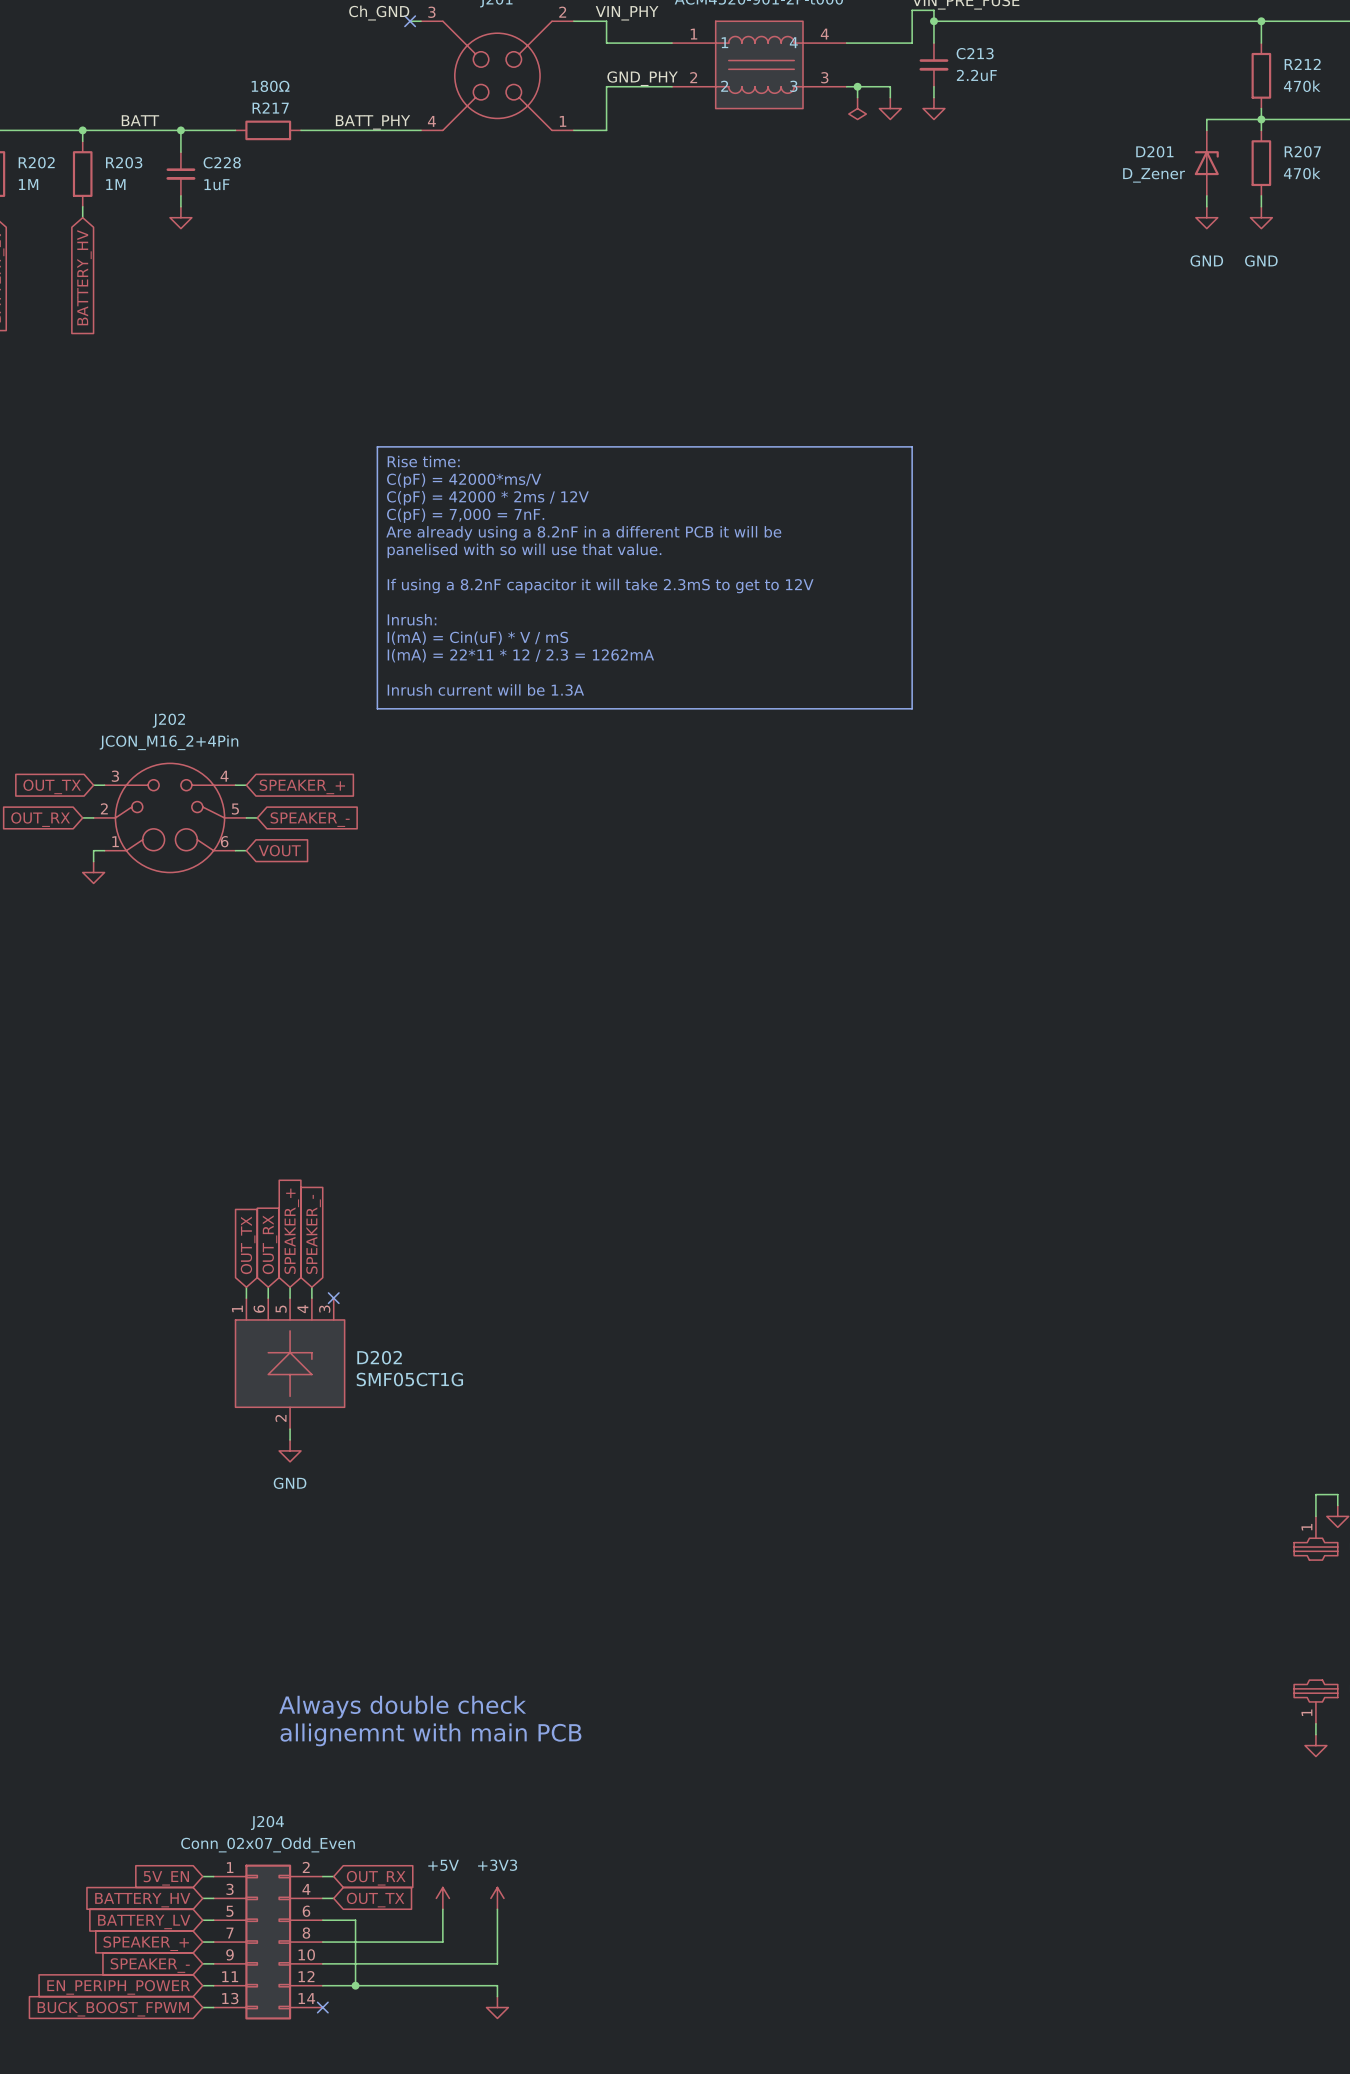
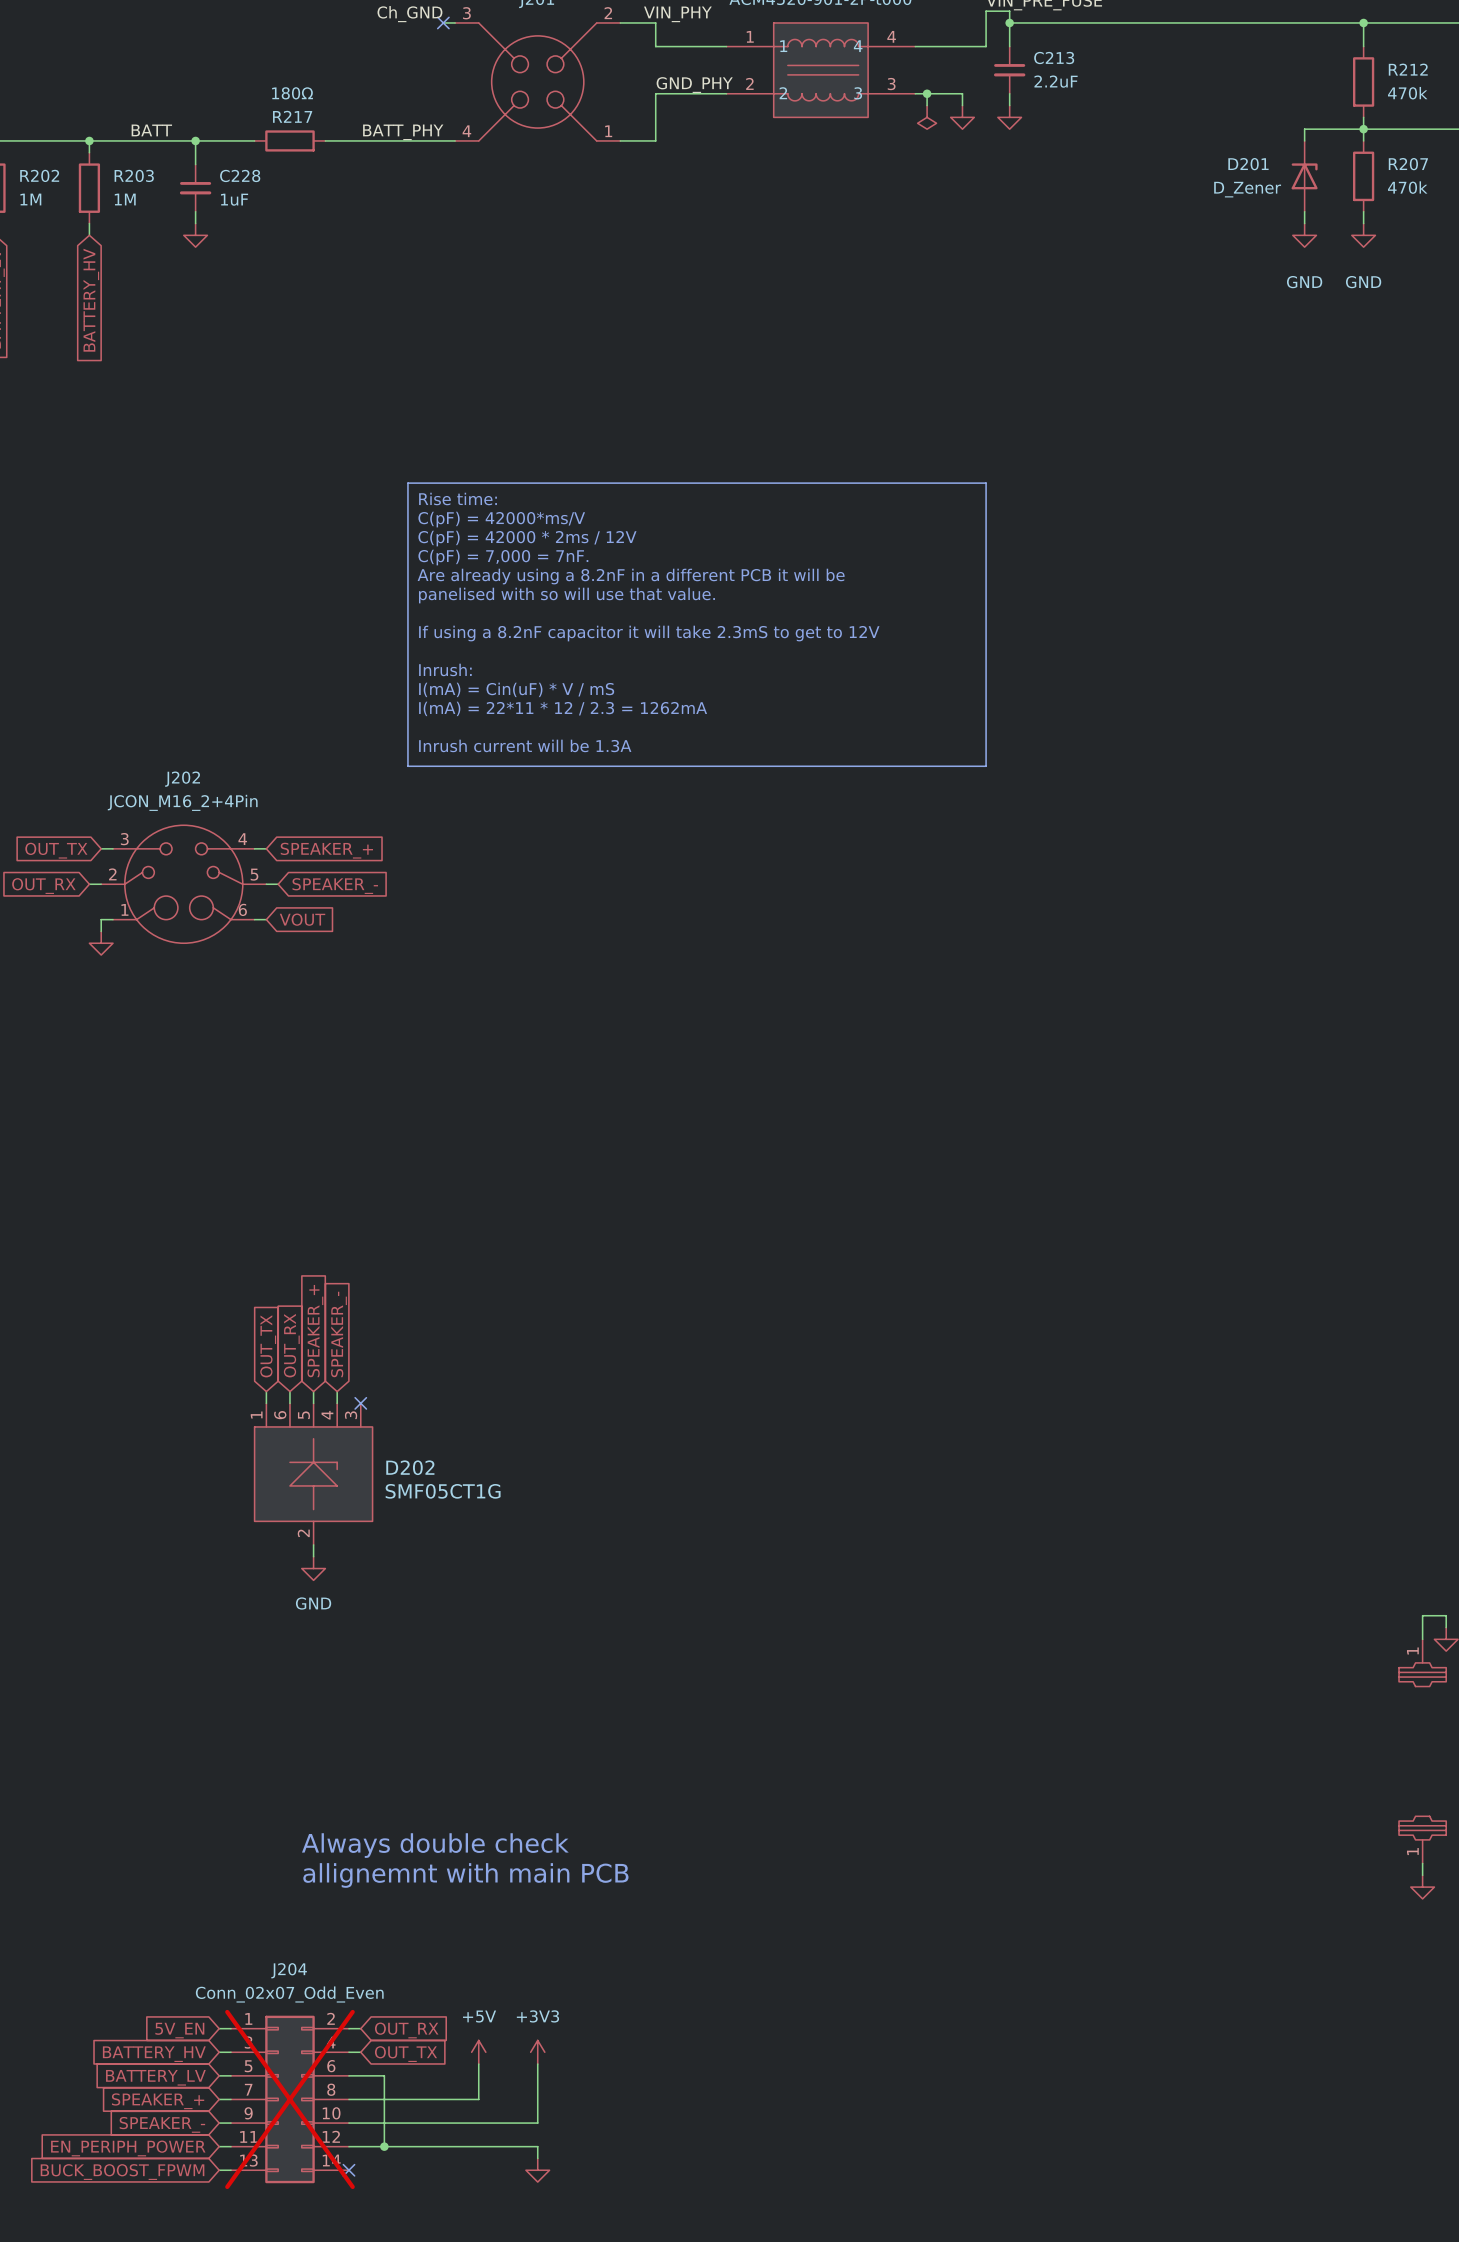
J204 do-not-place cross: none -> (289, 2099)

